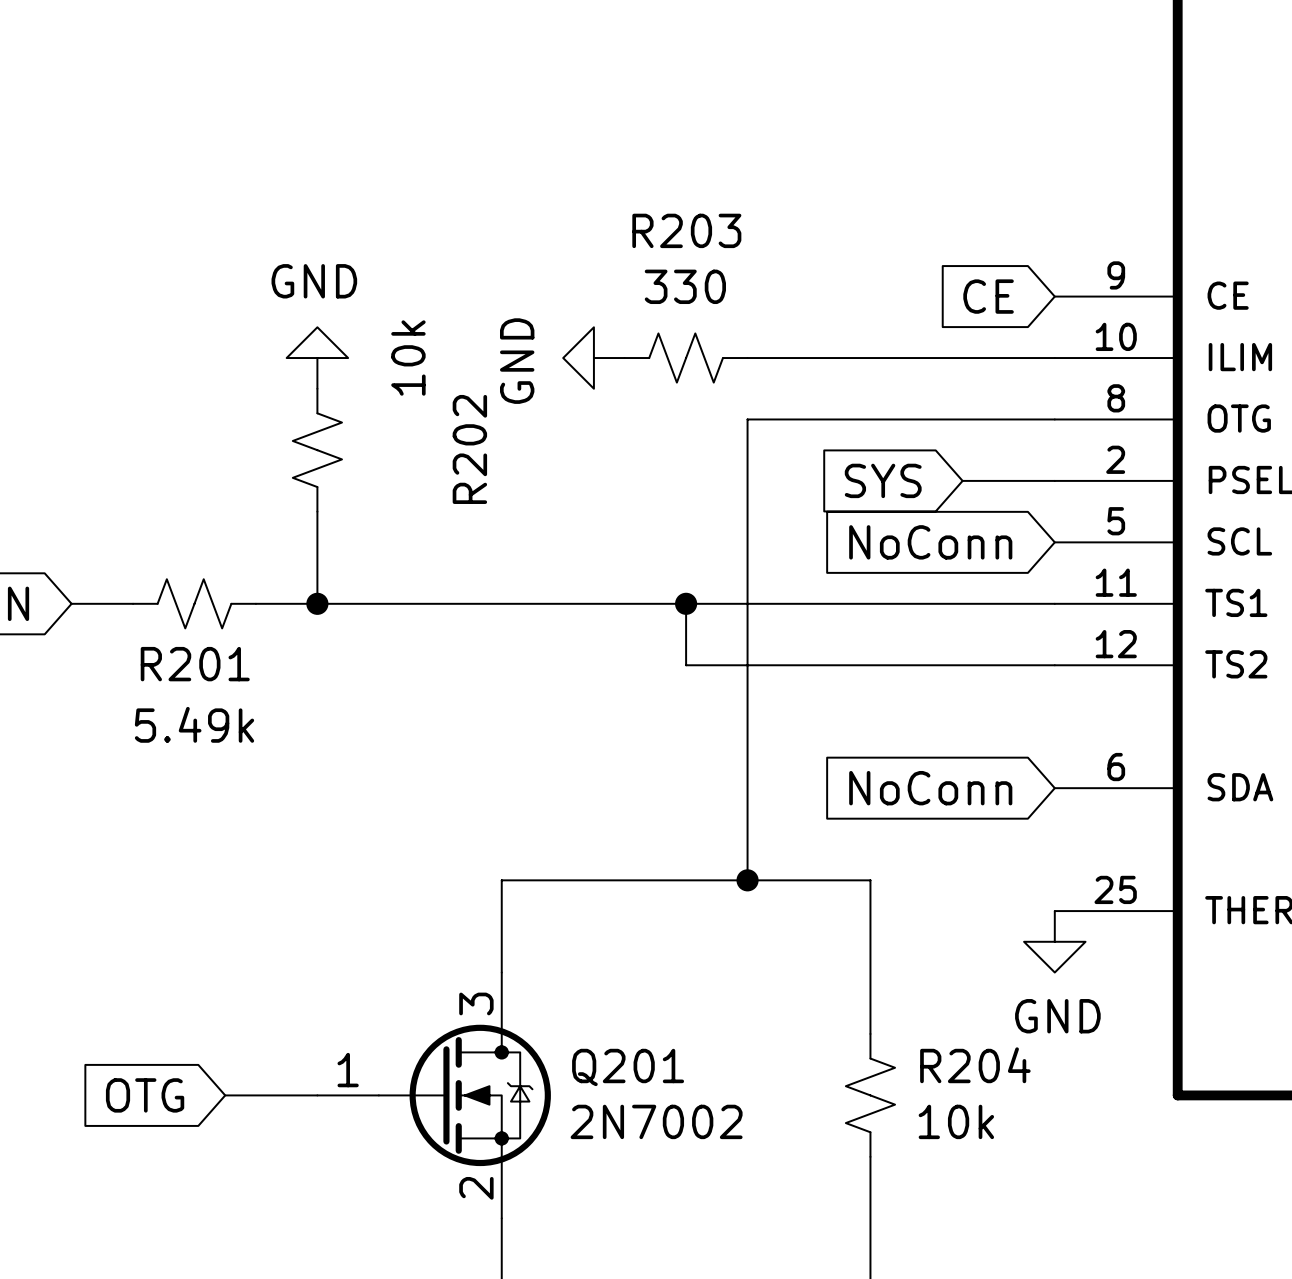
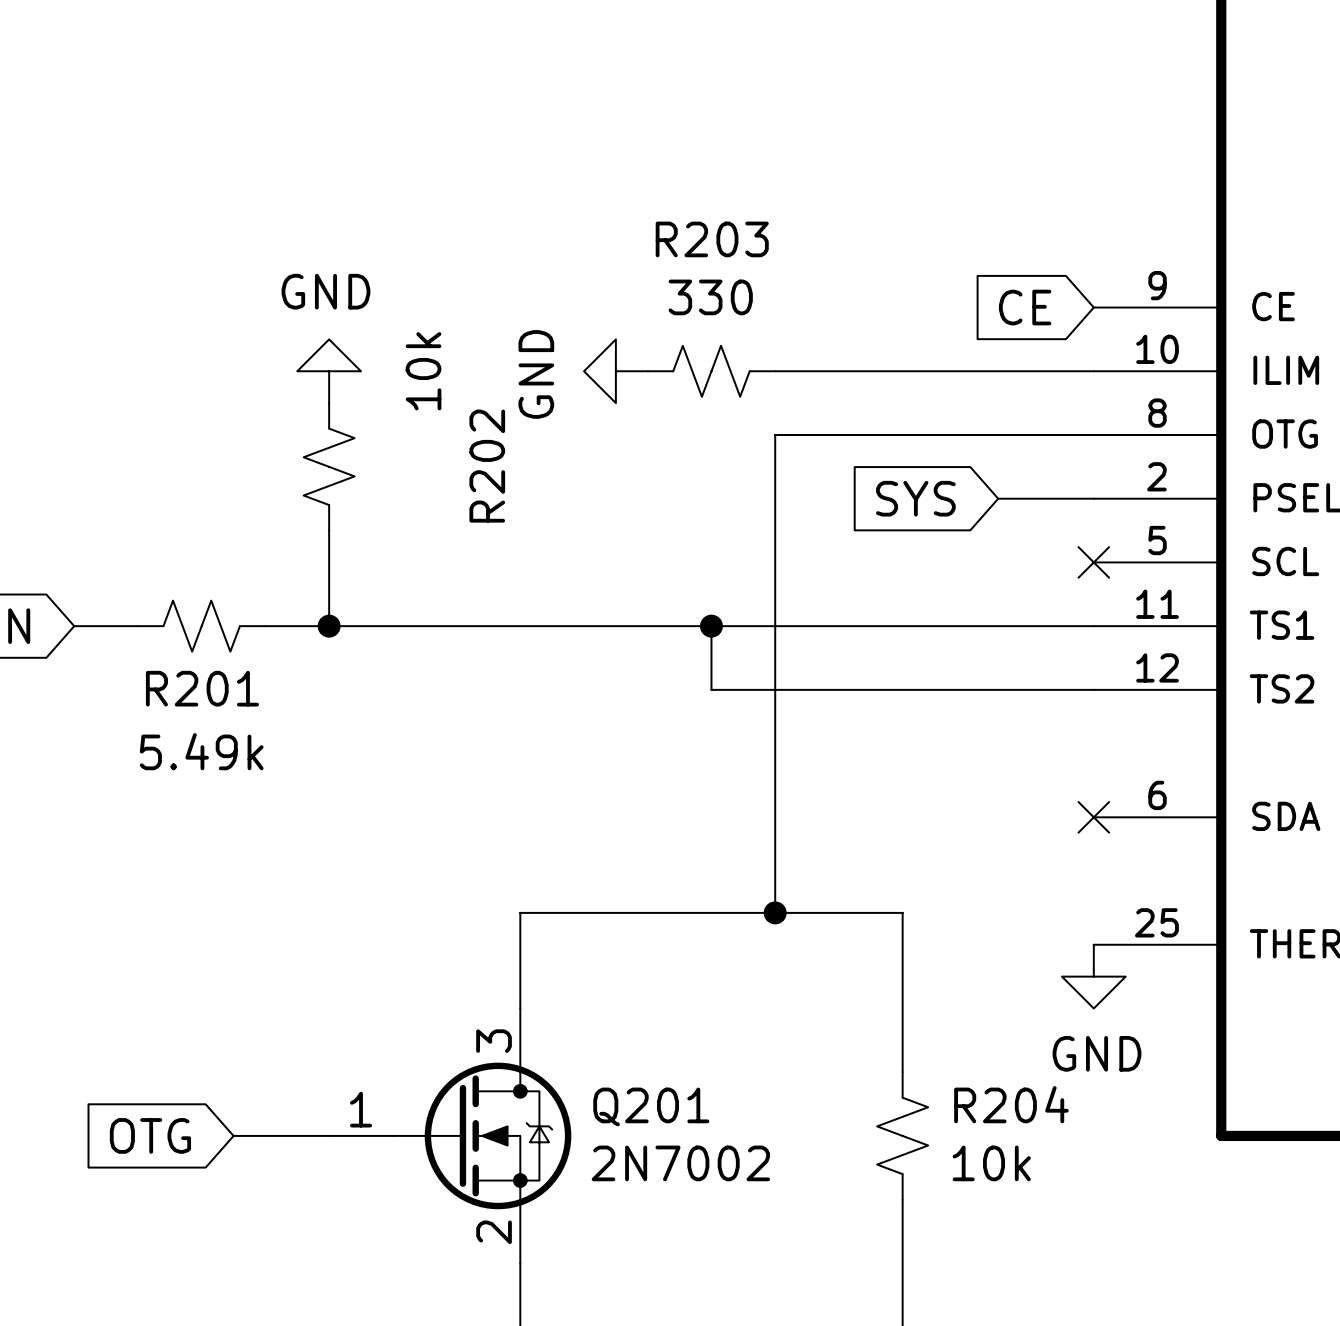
global label: NoConn (930, 542) -> none
no-connect mark: none -> (1093, 562)
global label: NoConn (930, 788) -> none
no-connect mark: none -> (1093, 817)

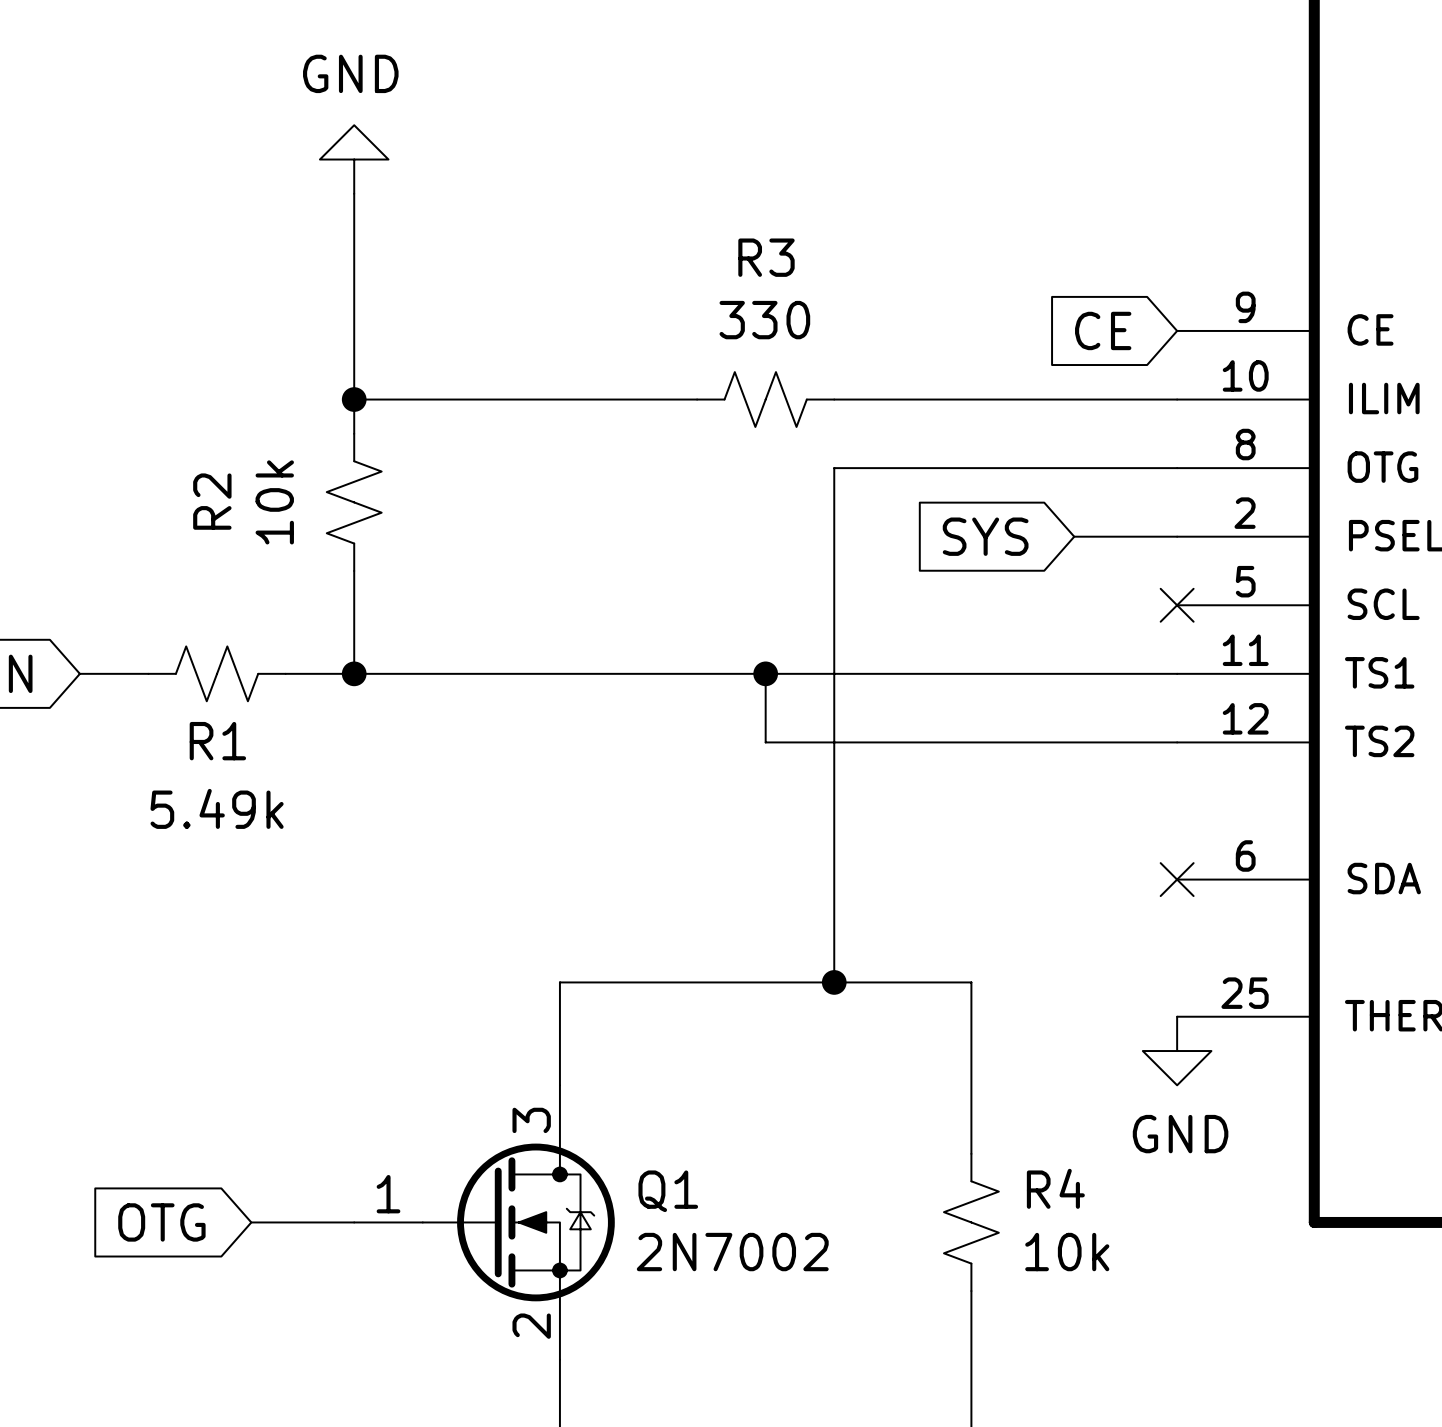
power symbol: none -> GND (354, 159)
wire: none -> (354, 193) (354, 433)
R203 name: R203 (712, 239) -> R3 (766, 257)
wire: none -> (354, 399) (697, 399)
power symbol: GND (329, 371) -> none
junction: none -> (354, 399)
R202 value position: 10k (423, 371) -> 10k (274, 502)
power symbol: GND (615, 371) -> none
R202 name: R202 (487, 466) -> R2 (212, 501)
R201 name: R201 (202, 688) -> R1 (217, 741)
R204 name: R204 (1011, 1104) -> R4 (1055, 1188)
Q201 name: Q201 (651, 1106) -> Q1 (668, 1191)

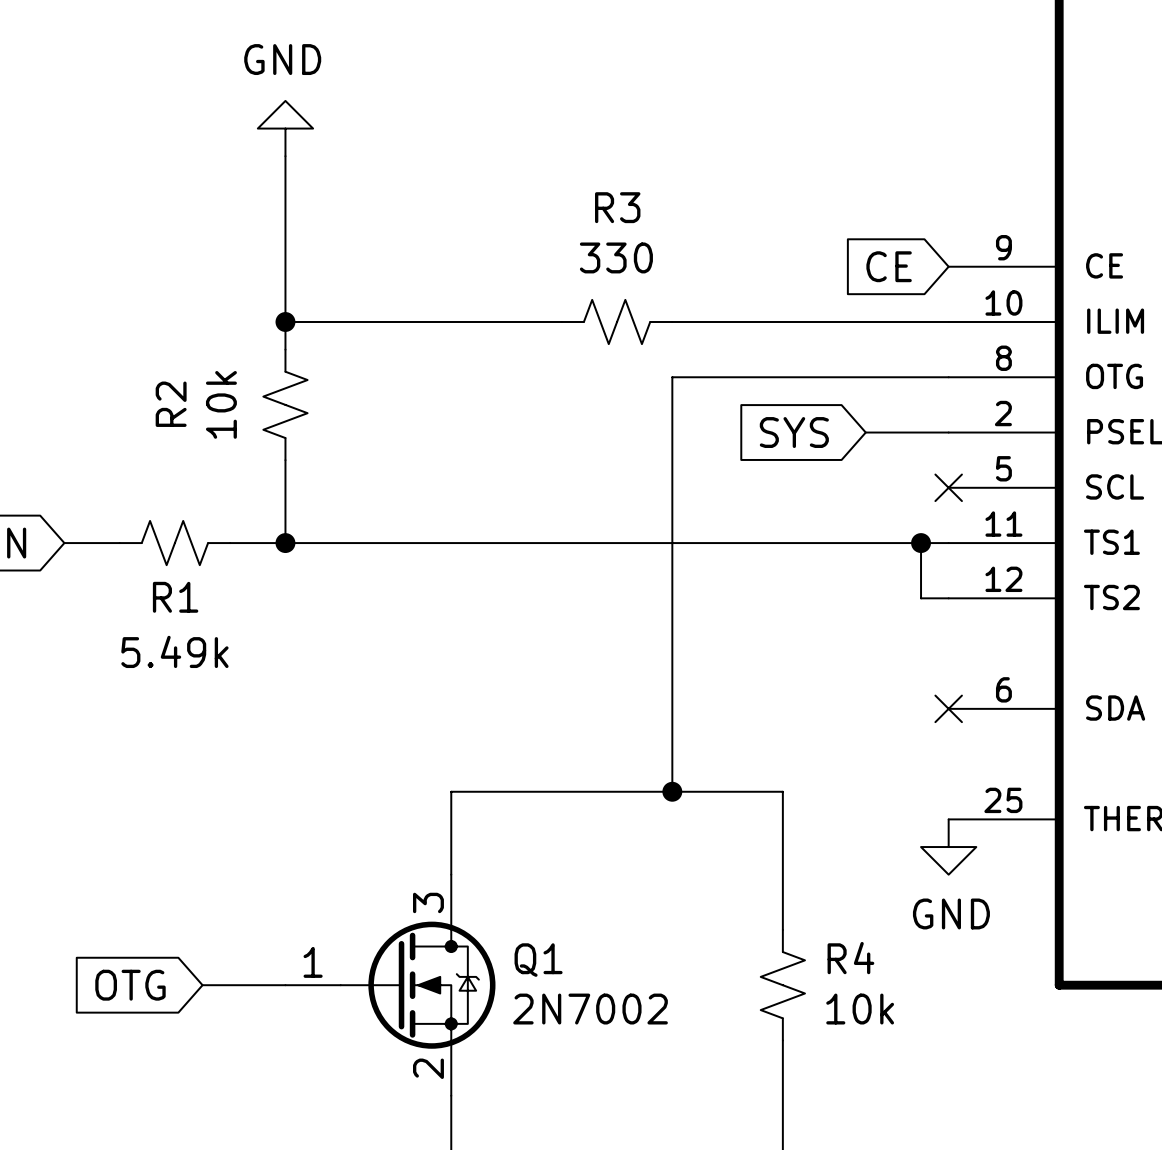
wire: (765, 673) (765, 742) (1142, 742) -> (921, 543) (921, 598)
junction: (765, 673) -> none
junction: none -> (921, 543)

